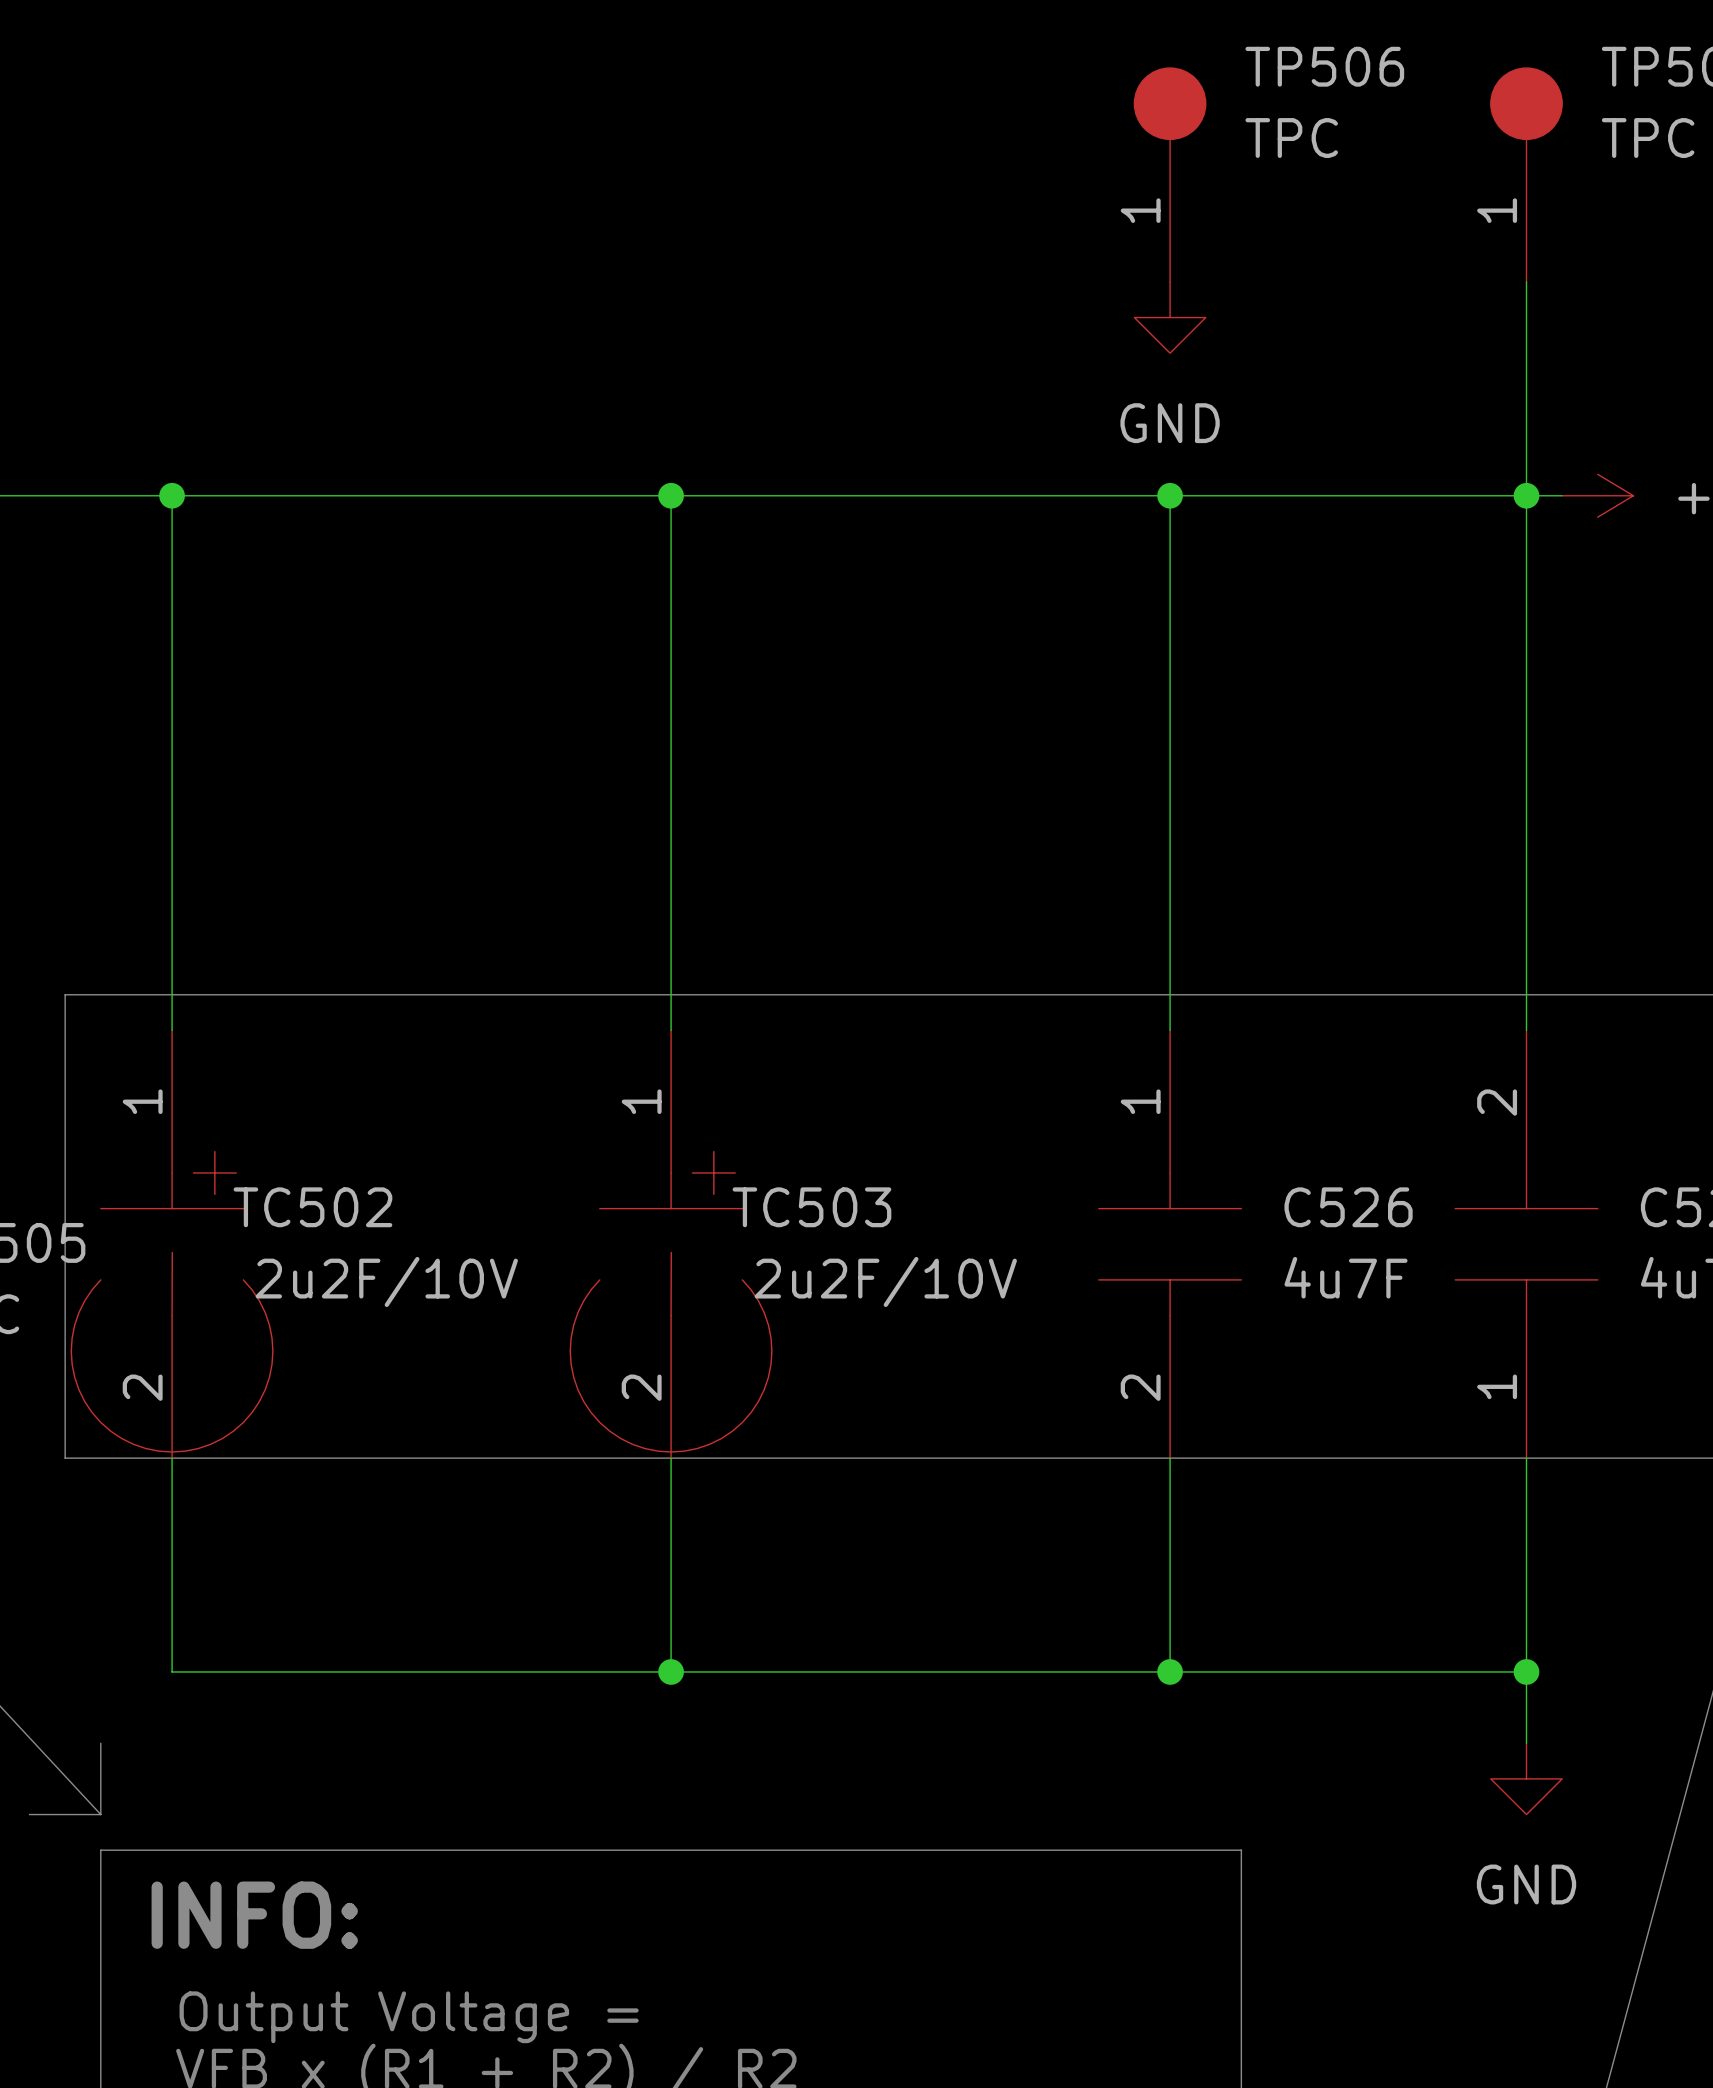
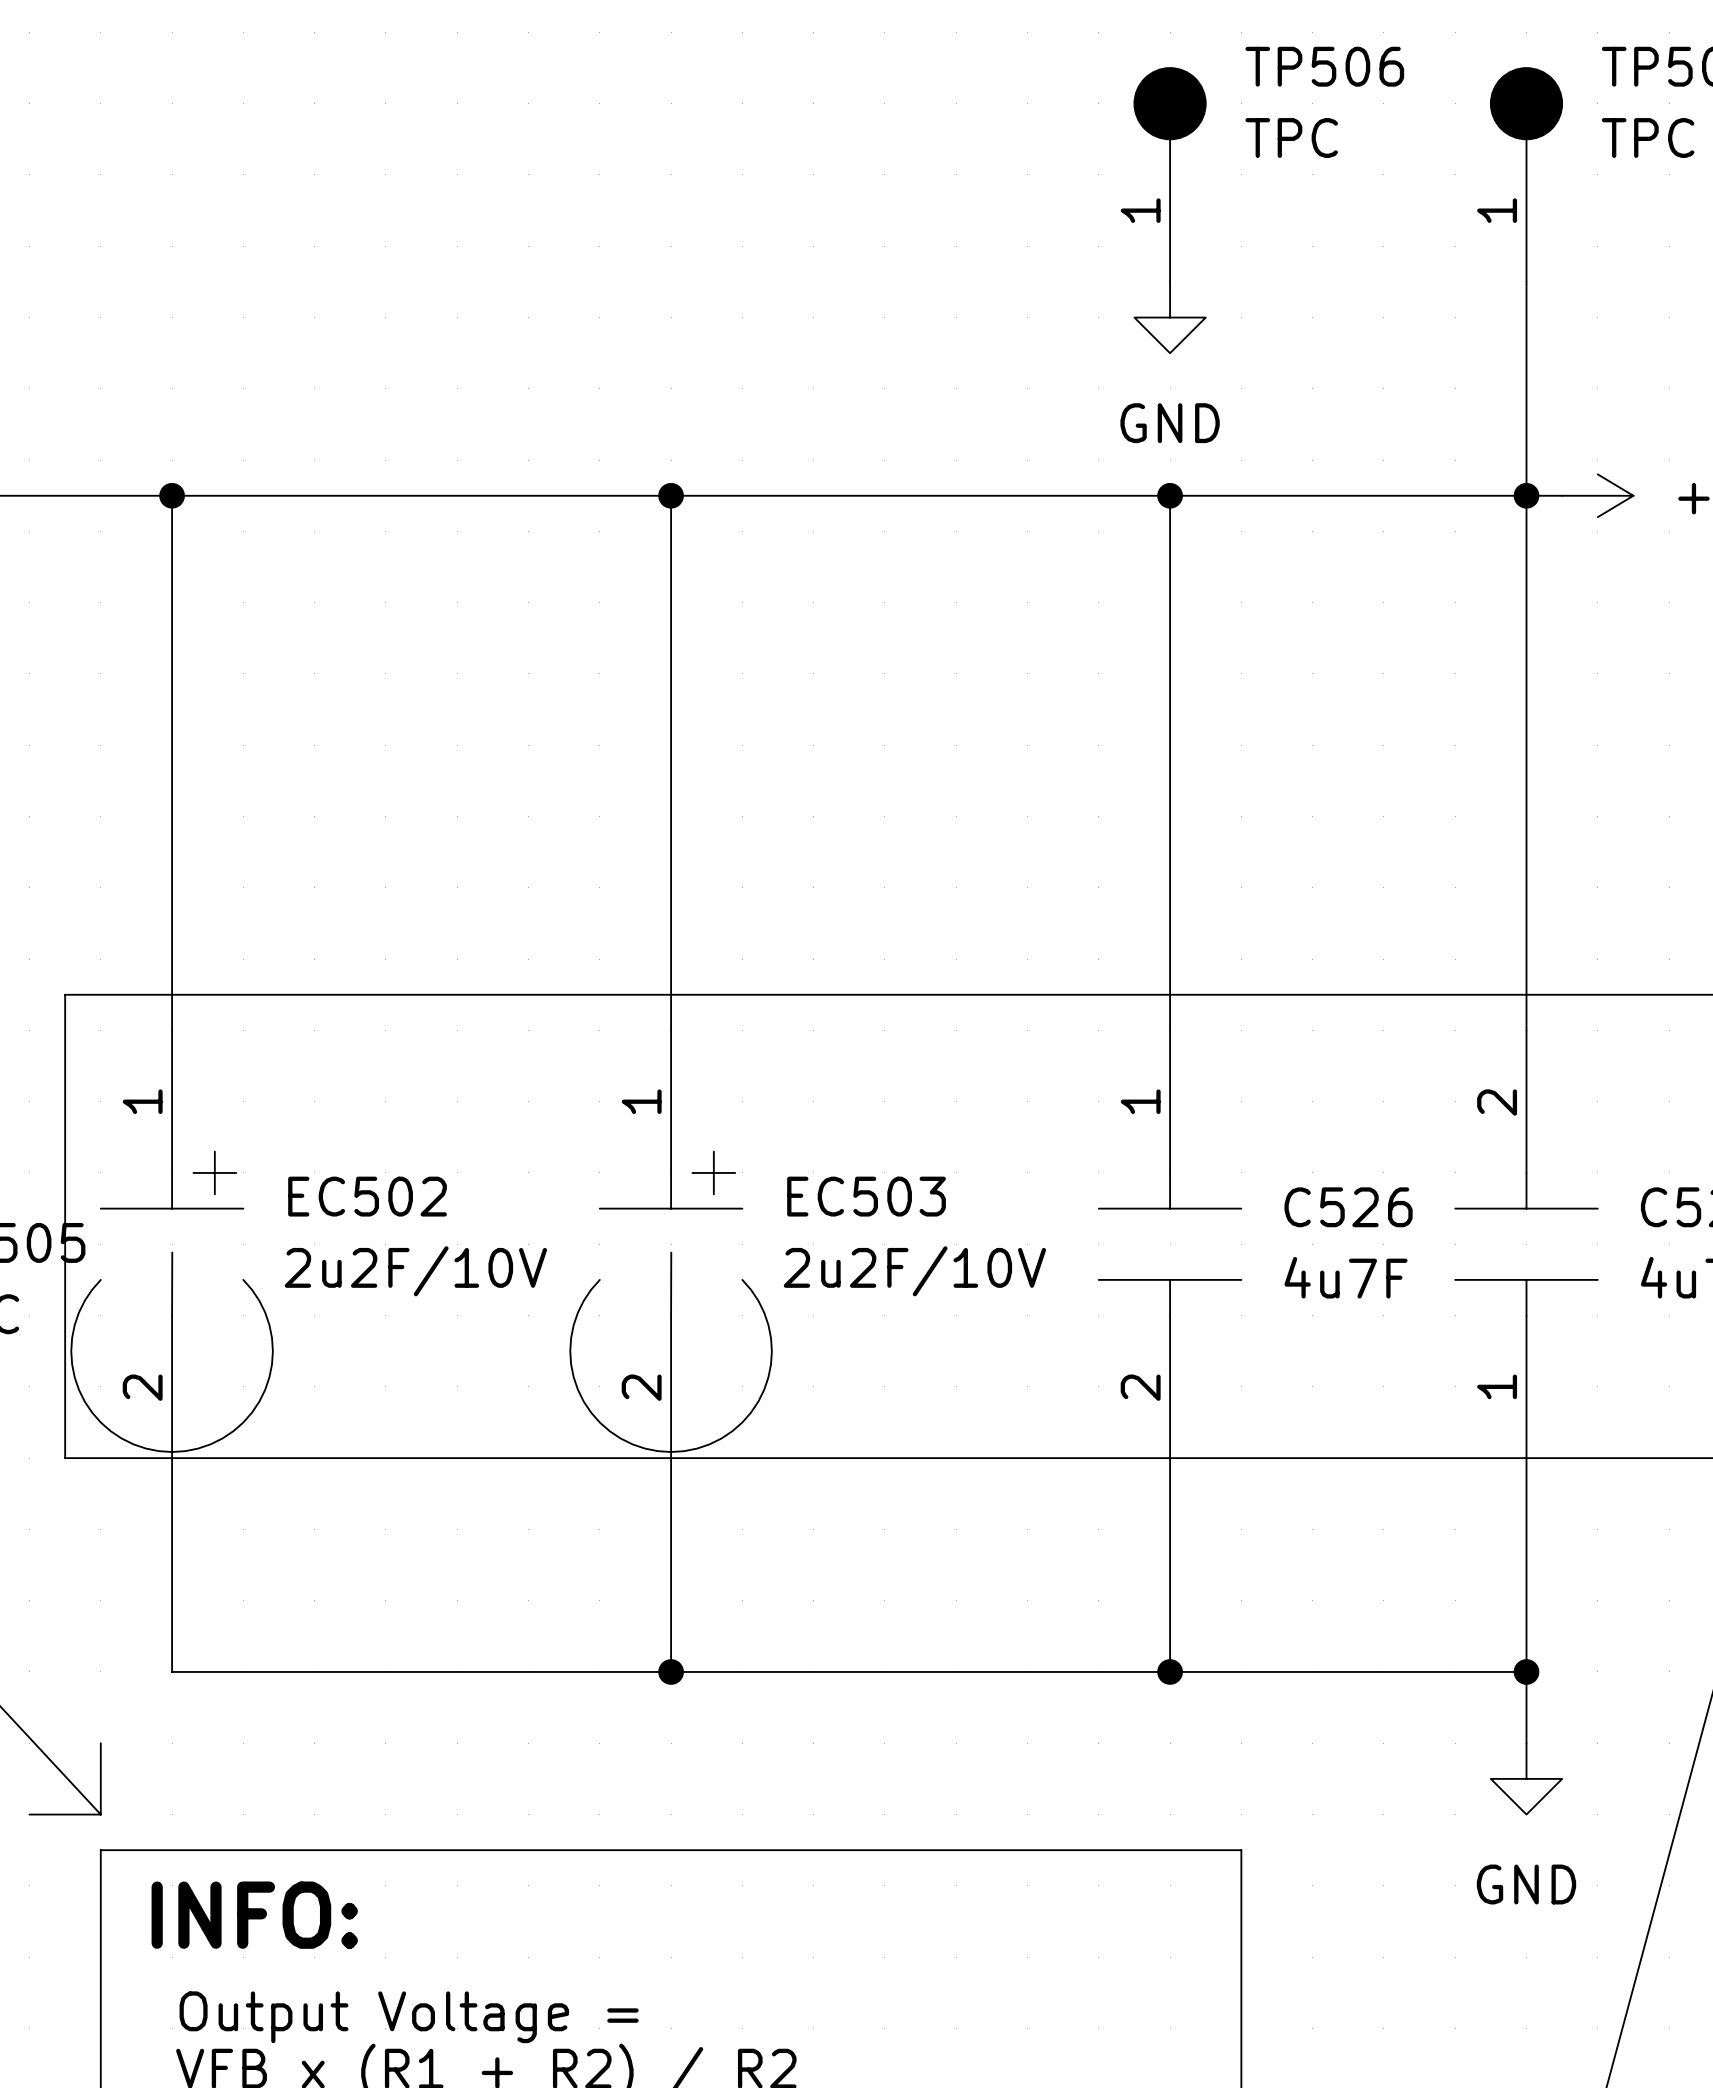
TC502 name: TC502 (312, 1207) -> EC502 (367, 1196)
TC503 name: TC503 (811, 1207) -> EC503 (866, 1196)
TC502 value position: 2u2F/10V (386, 1281) -> 2u2F/10V (415, 1271)
TC503 value position: 2u2F/10V (885, 1281) -> 2u2F/10V (914, 1271)

